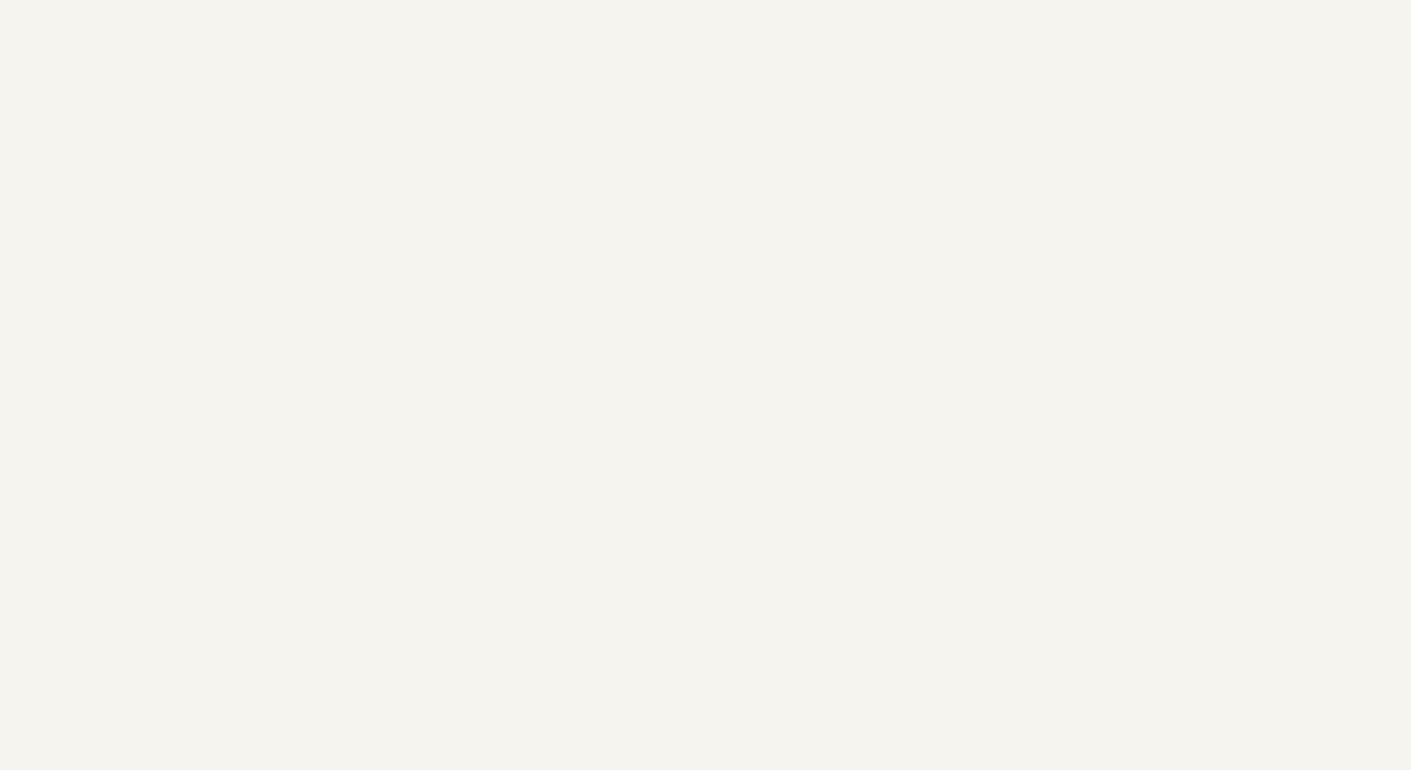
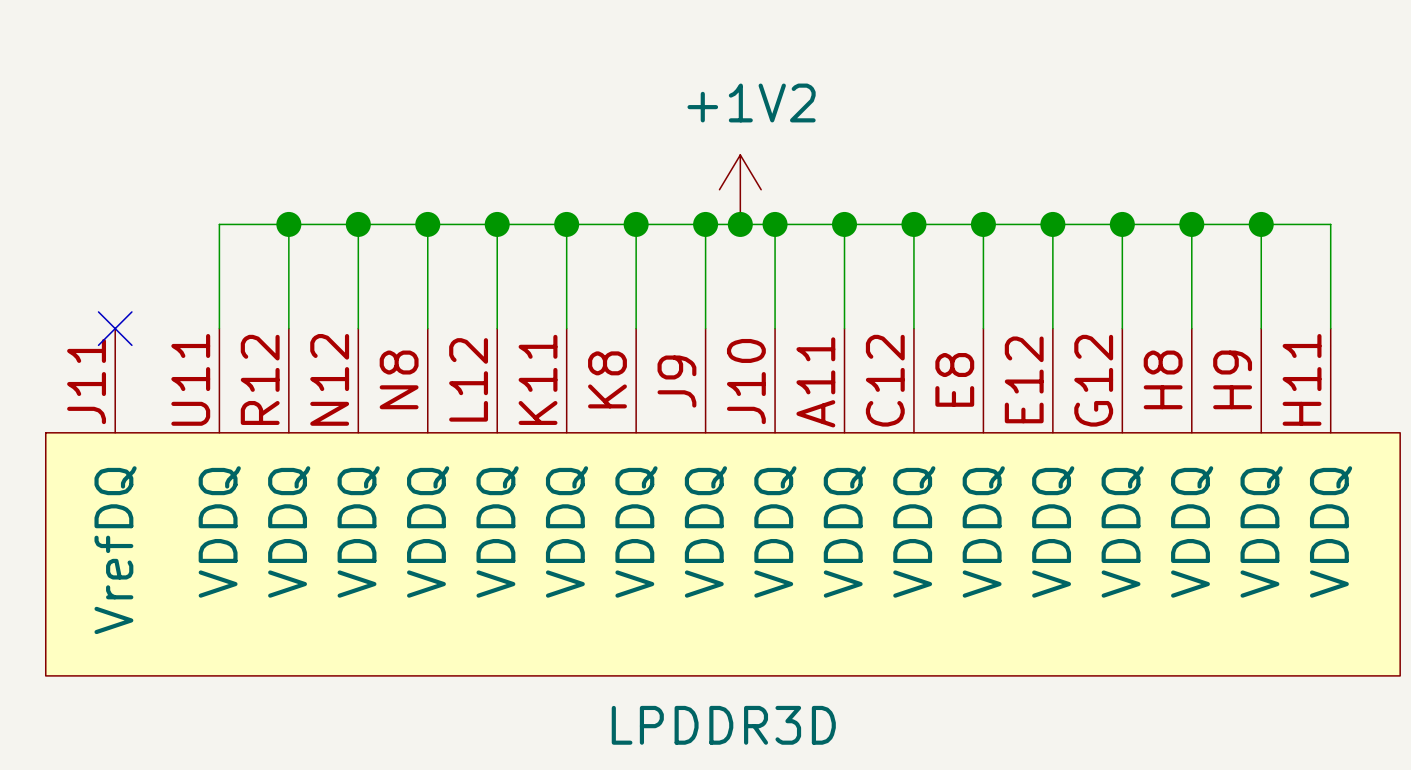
power symbol: none -> +1V2 (740, 189)
wire: none -> (288, 224) (288, 328)
junction: none -> (288, 224)
wire: none -> (358, 224) (358, 328)
junction: none -> (358, 224)
wire: none -> (427, 224) (427, 328)
junction: none -> (427, 224)
wire: none -> (497, 224) (497, 328)
junction: none -> (497, 224)
wire: none -> (566, 224) (566, 328)
junction: none -> (566, 224)
wire: none -> (636, 224) (636, 328)
junction: none -> (636, 224)
wire: none -> (705, 224) (705, 328)
junction: none -> (705, 224)
junction: none -> (740, 224)
wire: none -> (775, 224) (775, 328)
junction: none -> (775, 224)
wire: none -> (844, 224) (844, 328)
junction: none -> (844, 224)
wire: none -> (913, 224) (913, 328)
junction: none -> (913, 224)
wire: none -> (983, 224) (983, 328)
junction: none -> (983, 224)
wire: none -> (1052, 224) (1052, 328)
junction: none -> (1052, 224)
wire: none -> (1122, 224) (1122, 328)
junction: none -> (1122, 224)
wire: none -> (1191, 224) (1191, 328)
junction: none -> (1191, 224)
wire: none -> (1261, 224) (1261, 328)
junction: none -> (1261, 224)
no-connect mark: none -> (115, 328)
wire: none -> (219, 328) (219, 224) (1330, 224) (1330, 328)
LPDDR3D: none -> (722, 502)

